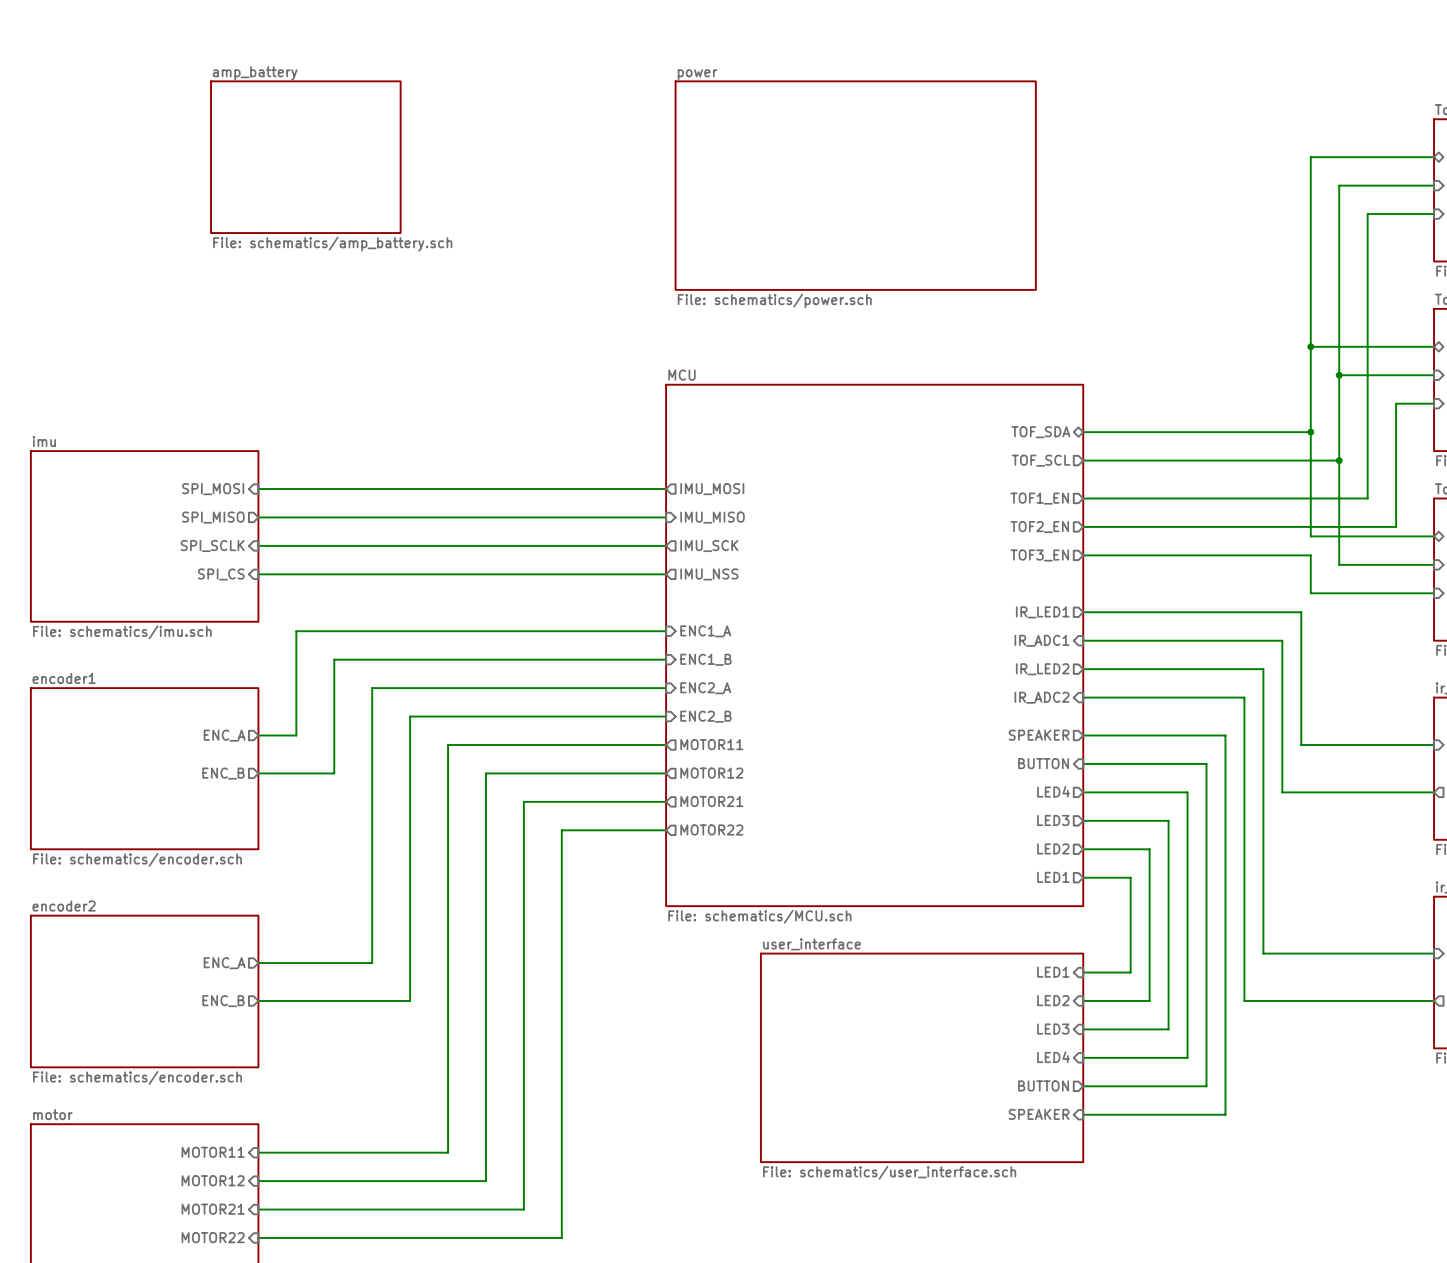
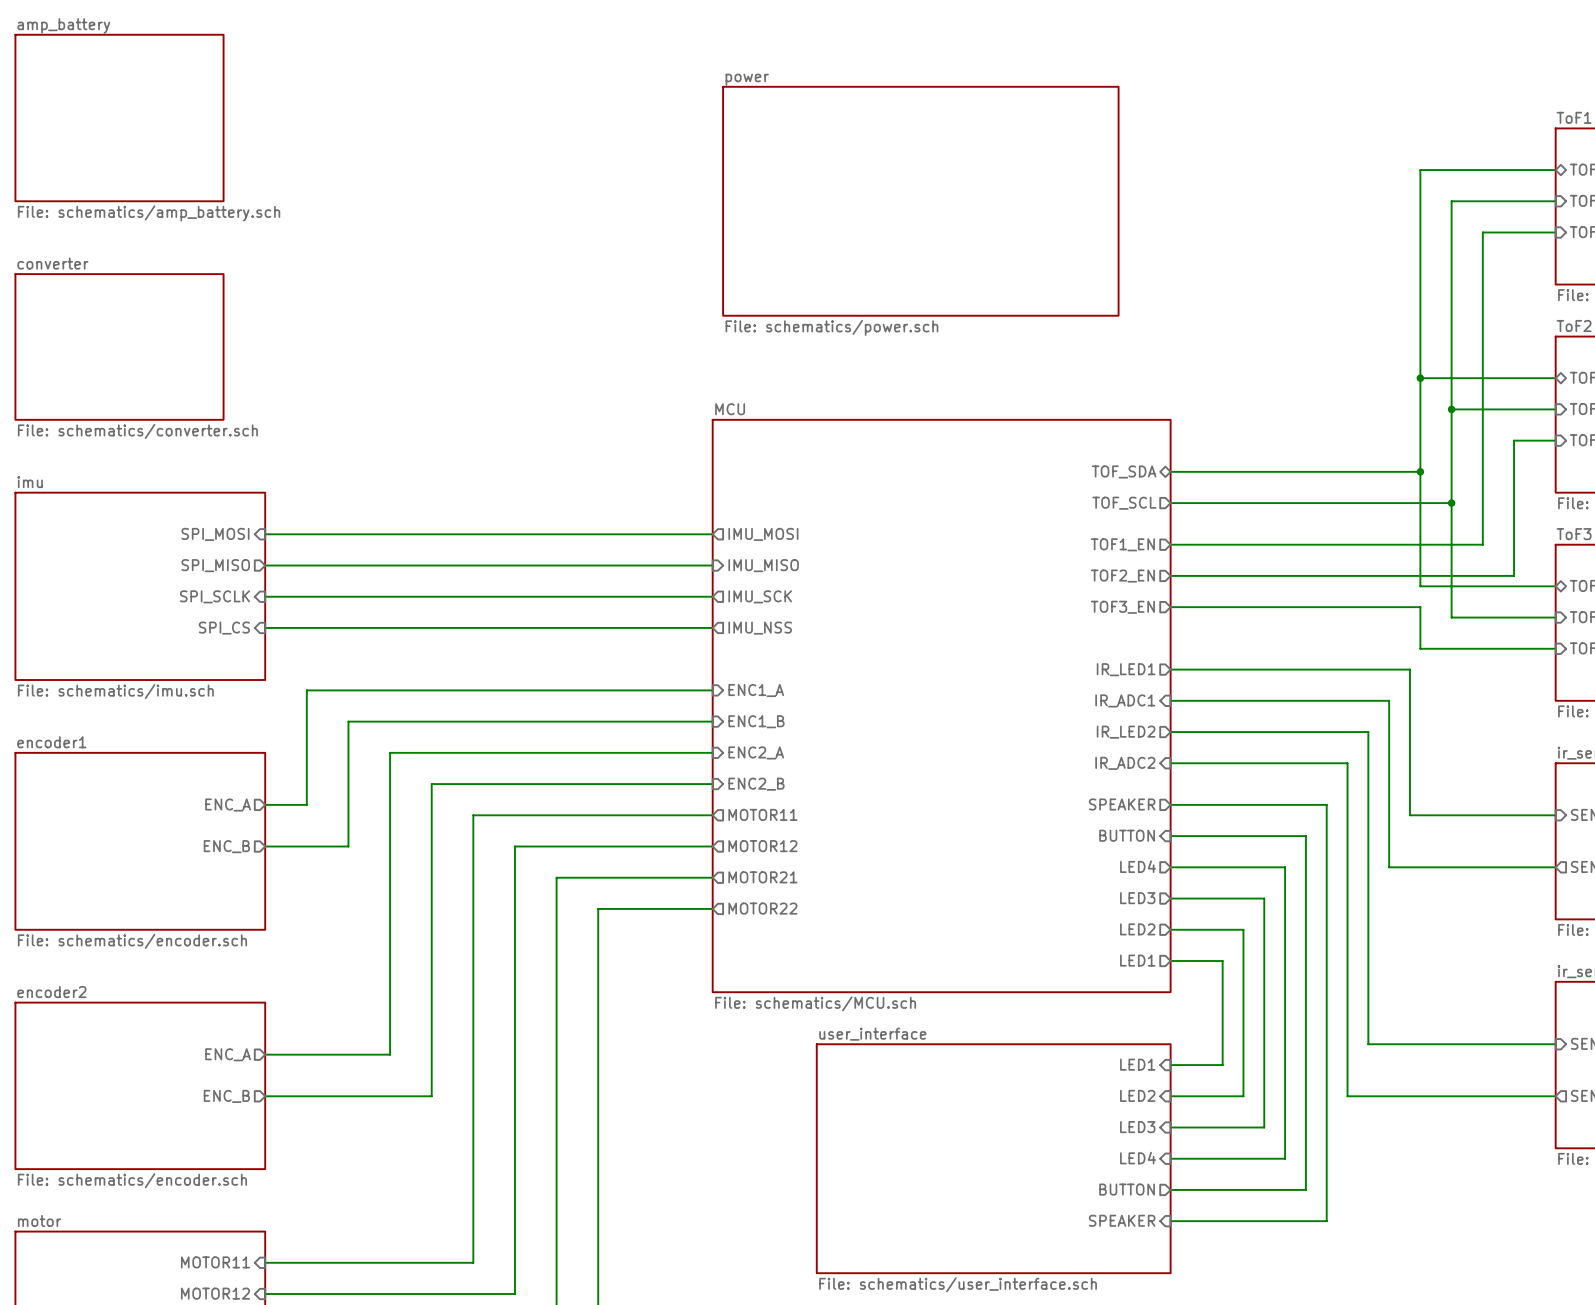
sheet amp_battery position: (305, 157) -> (119, 118)
sheet converter: none -> File: schematics/converter.sch (119, 346)

